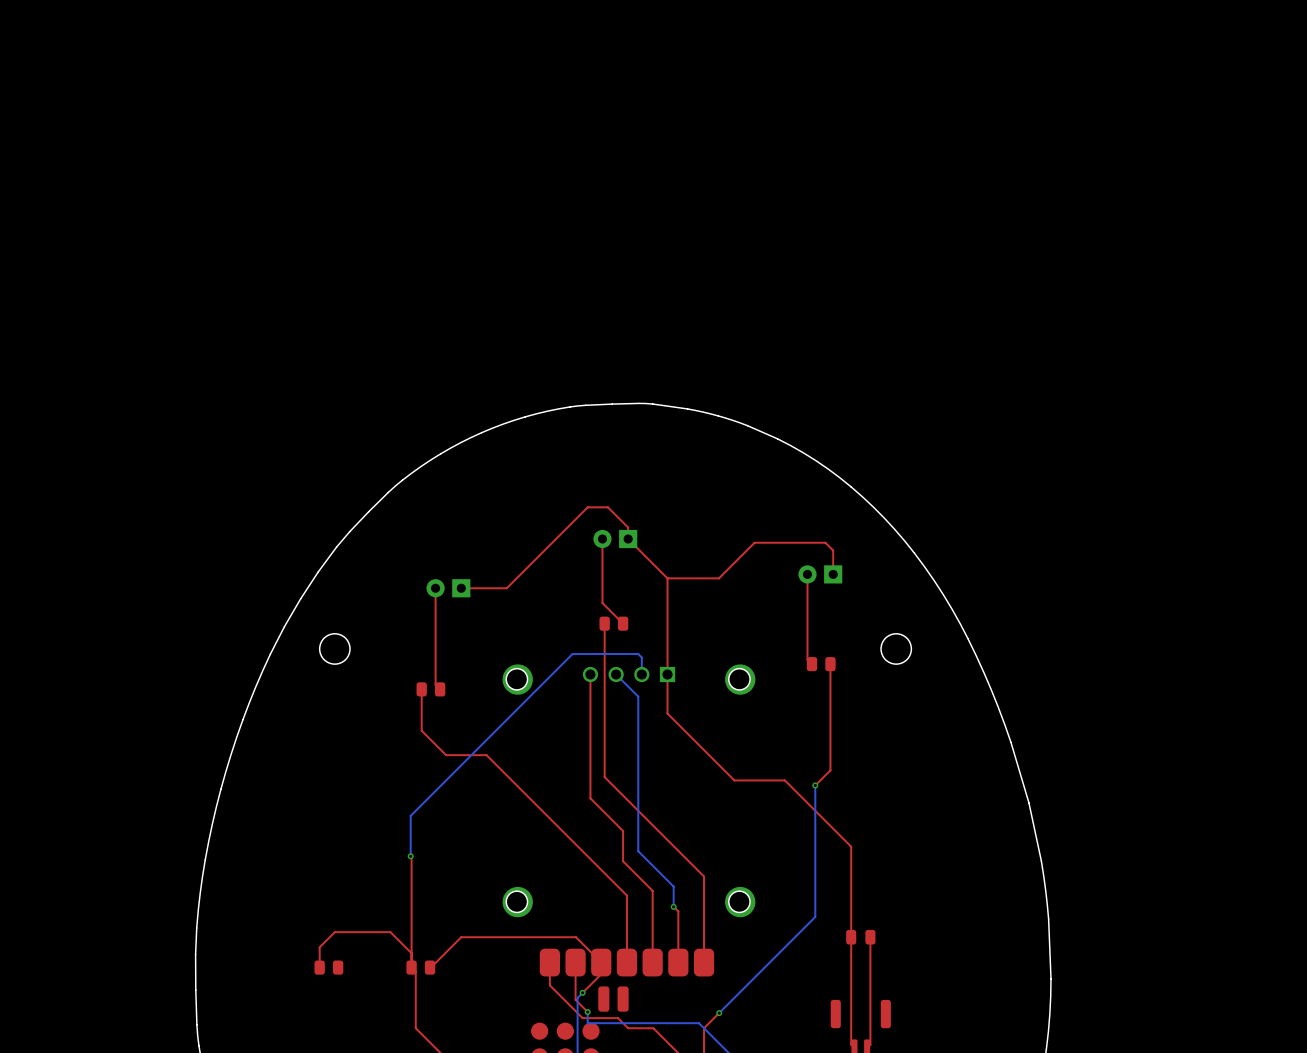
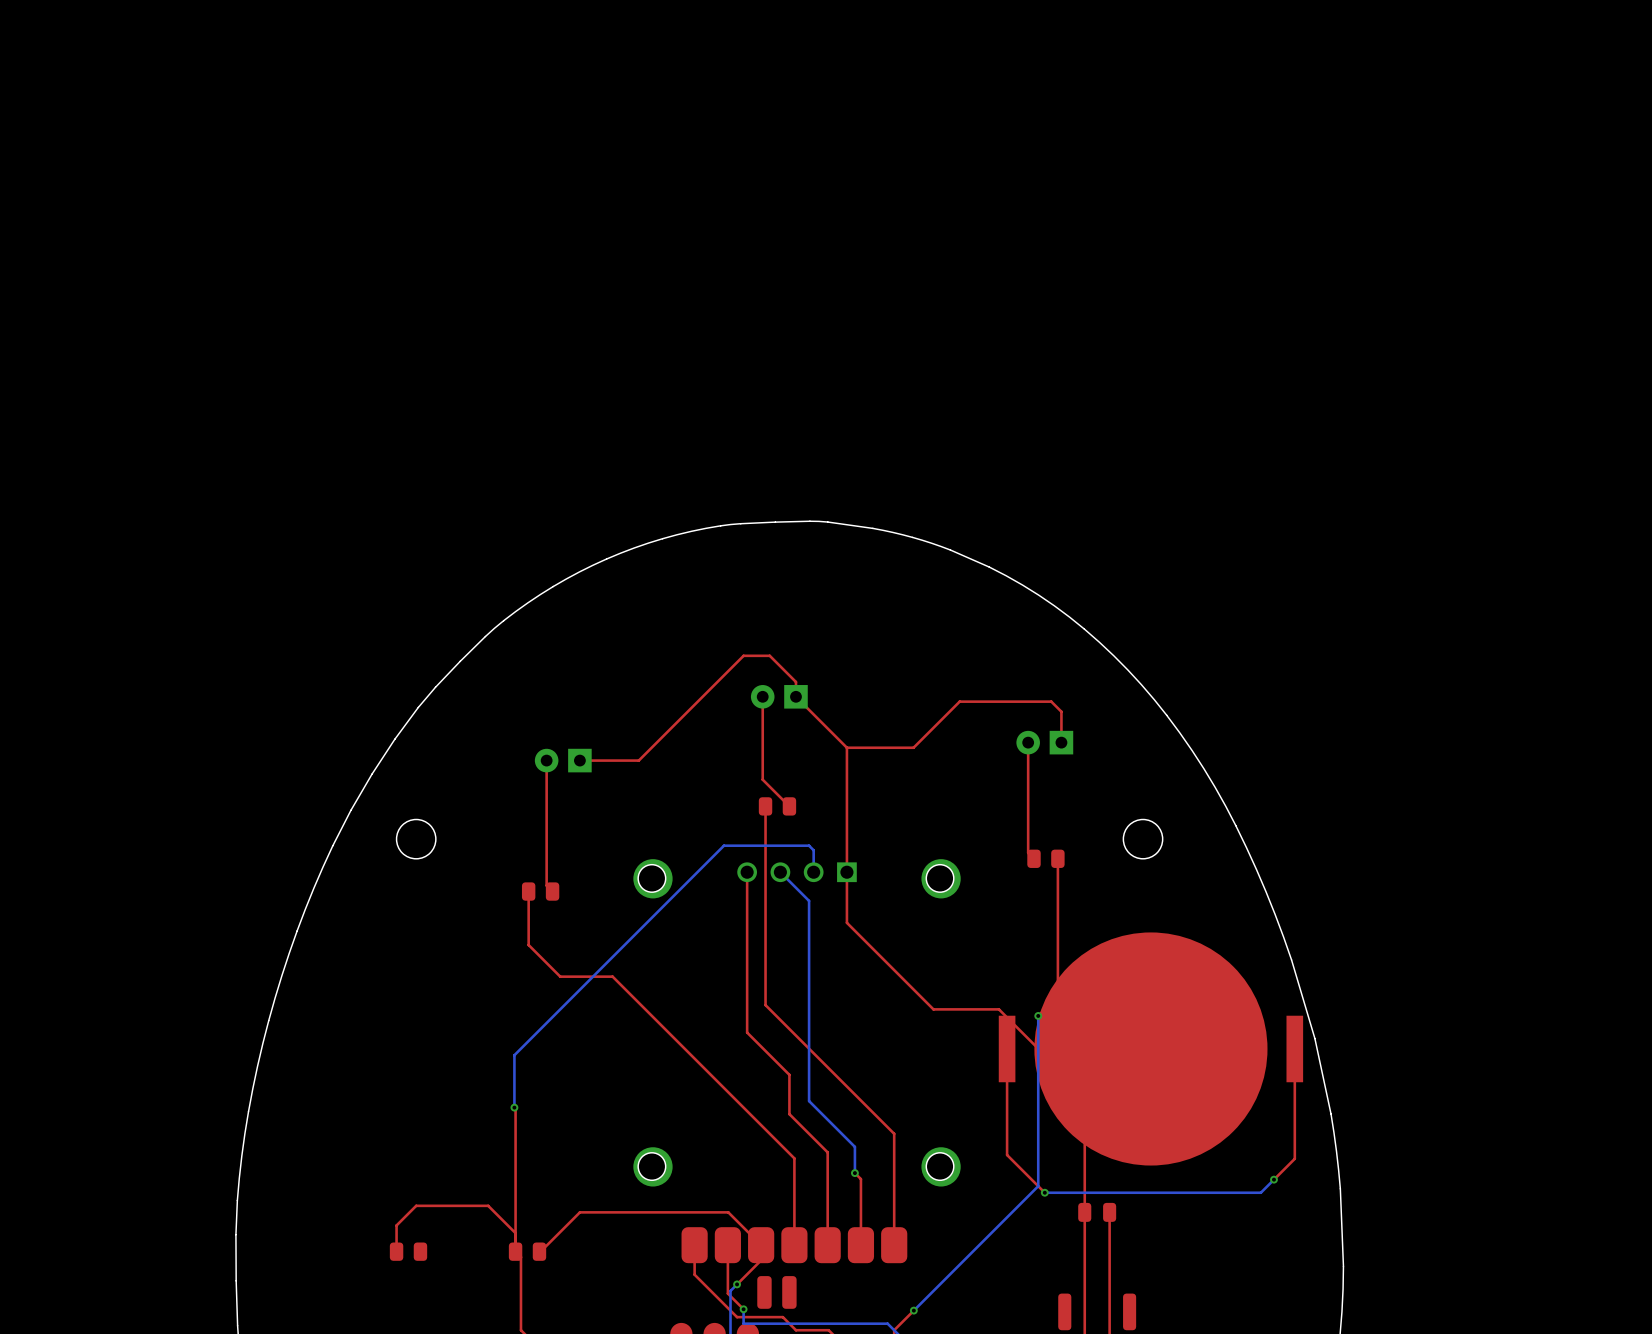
top track: none -> (1007, 1048) (1007, 1155) (1044, 1192)
part: none -> (1150, 1048)
top track: none -> (1294, 1048) (1294, 1158) (1273, 1179)
bottom track: none -> (1273, 1179) (1260, 1192) (1044, 1192)
via: none -> (1273, 1179)
via: none -> (1044, 1192)

